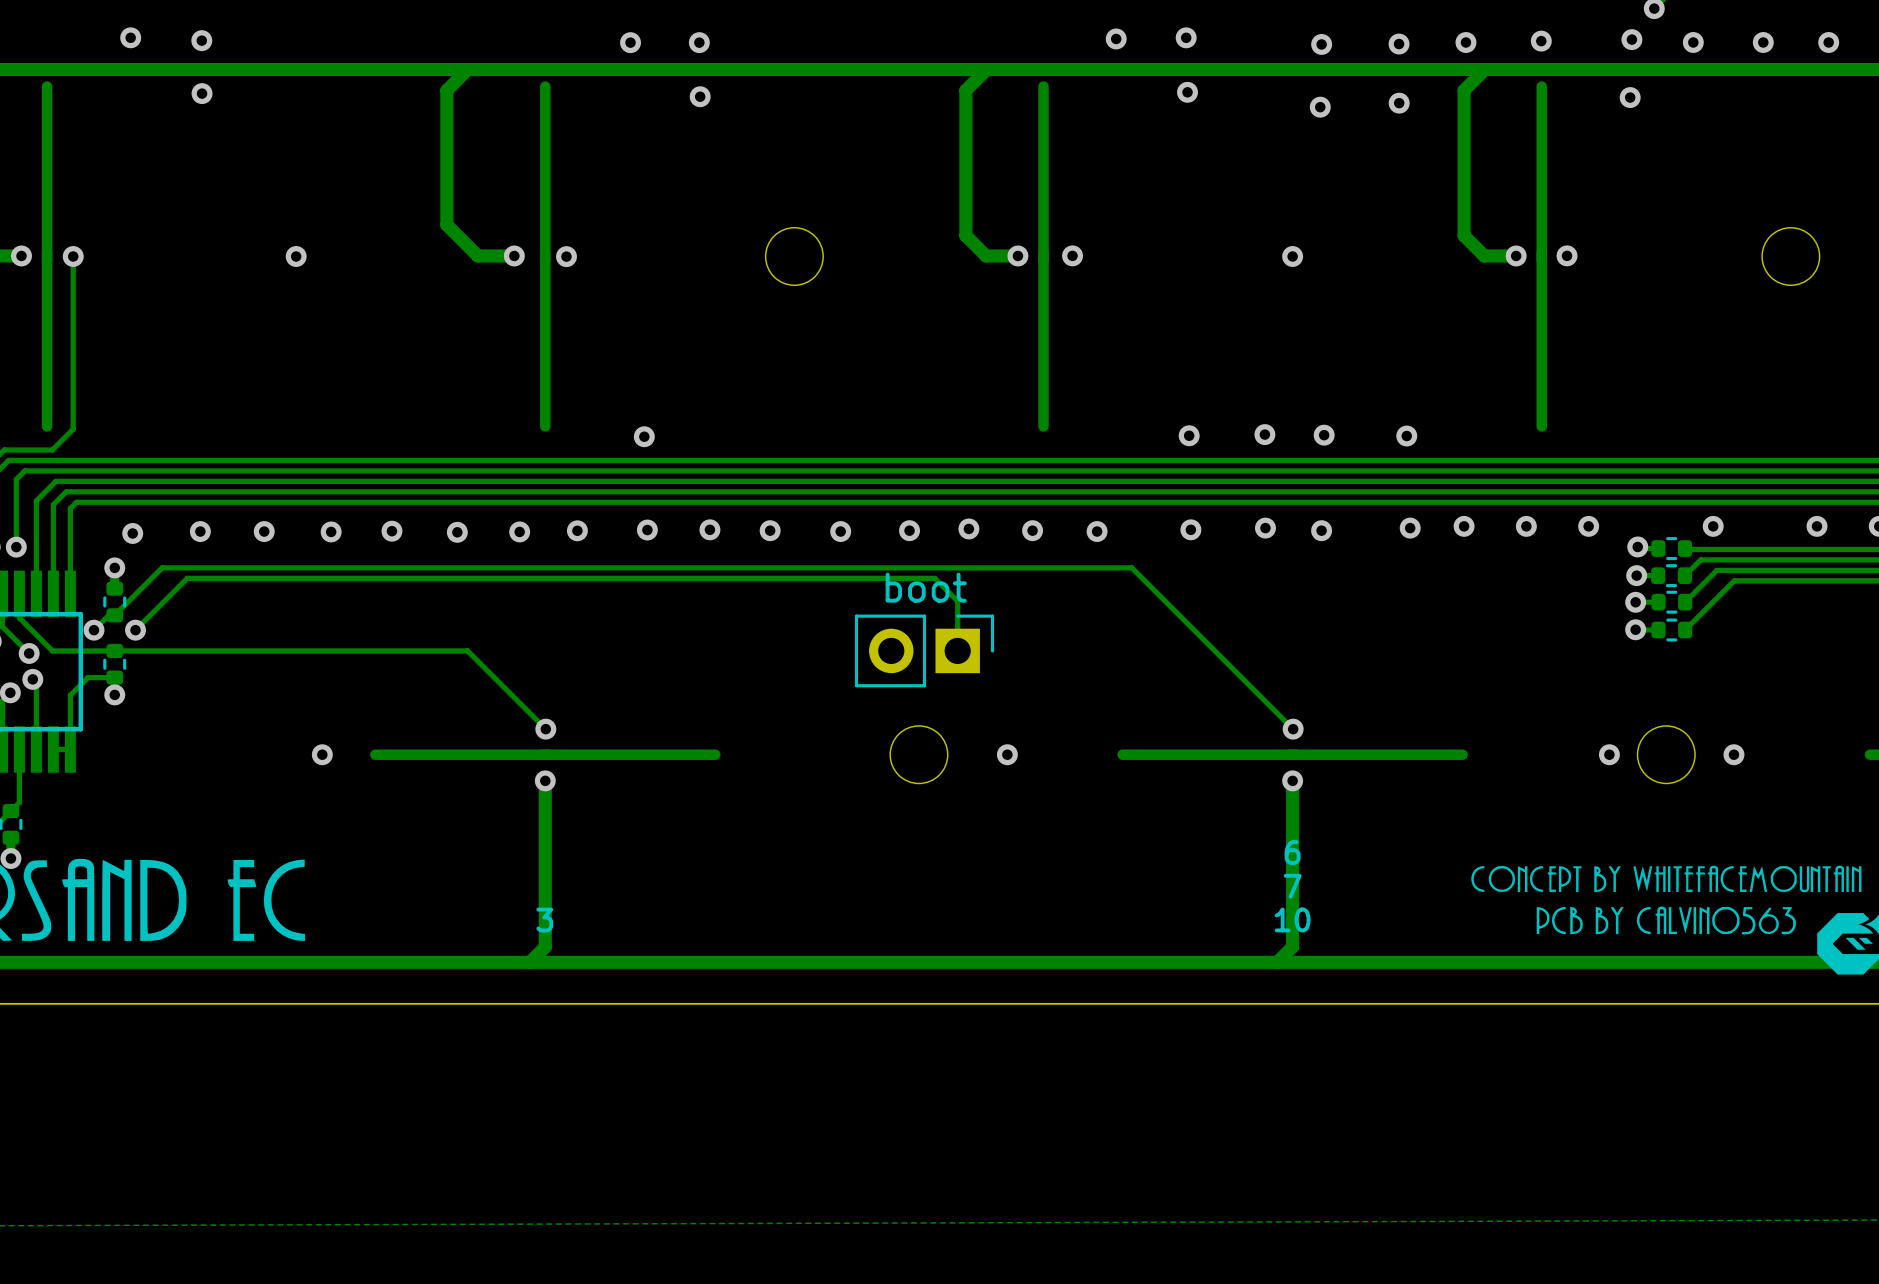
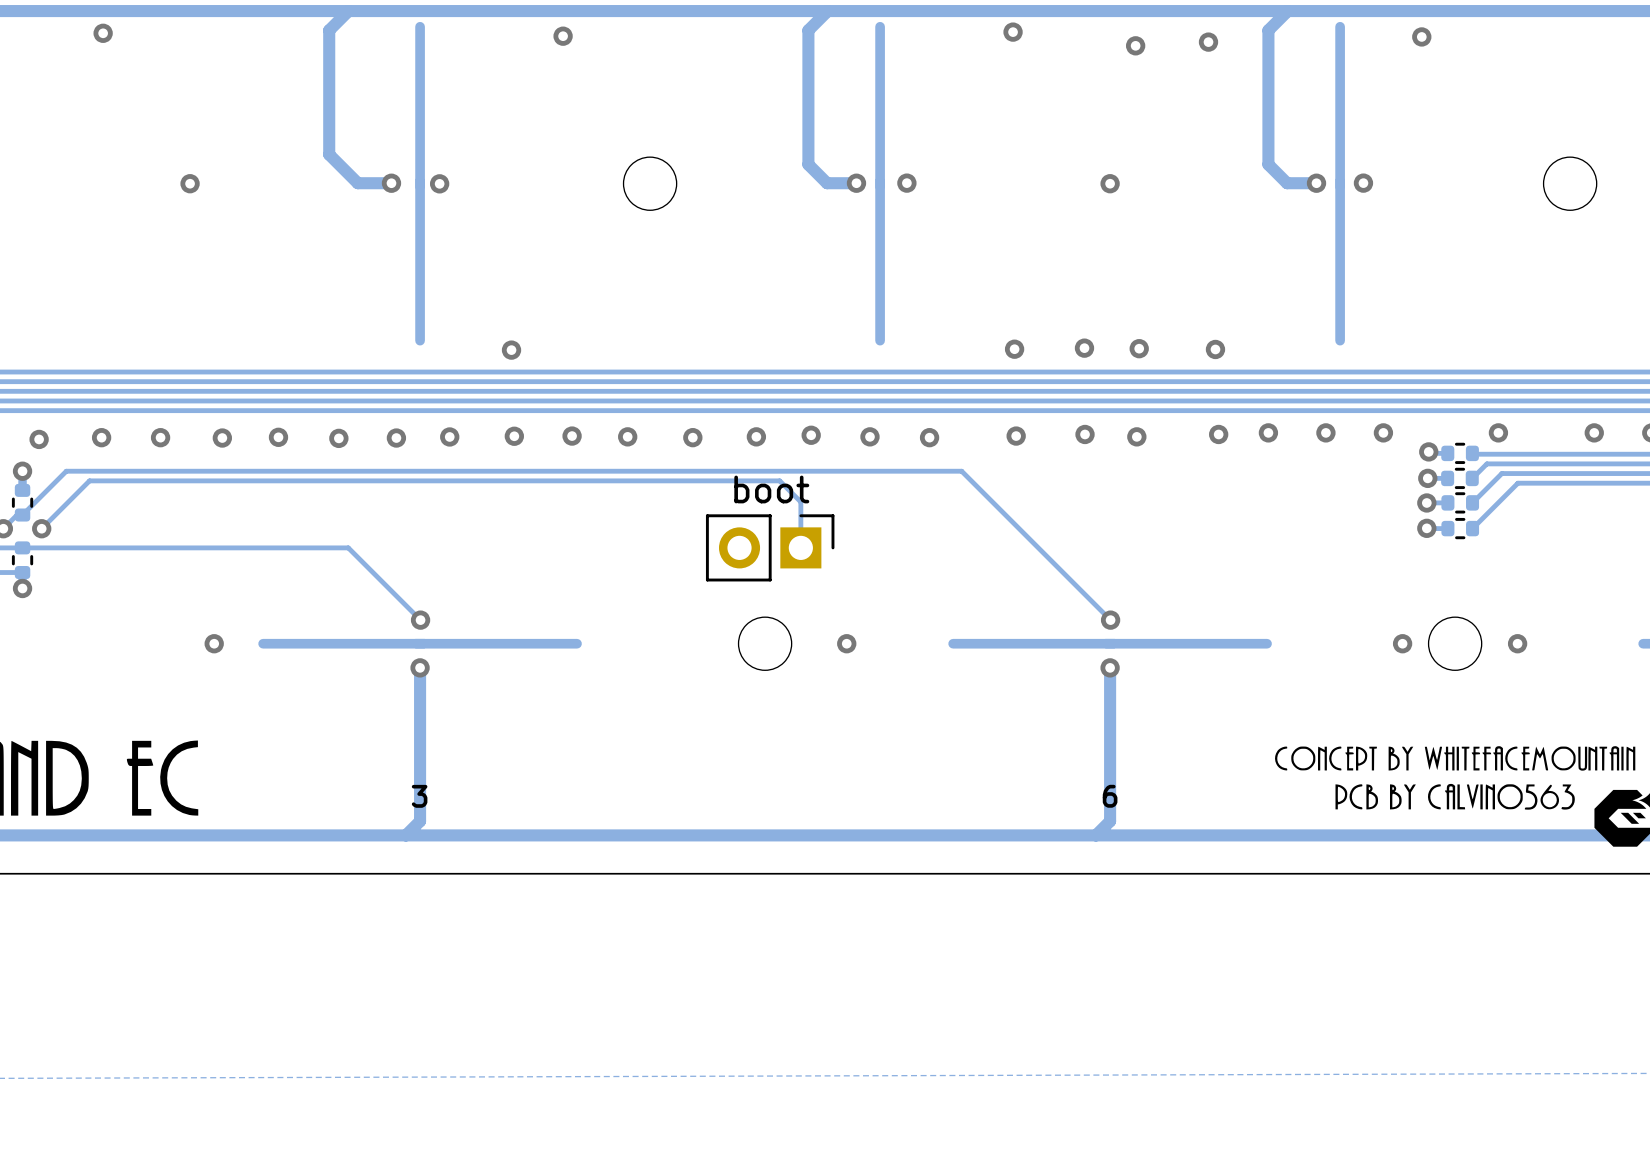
text: 6 (1292, 852) -> none
text: 7 (1292, 886) -> none
text: 10 (1292, 919) -> 6 (1110, 796)

